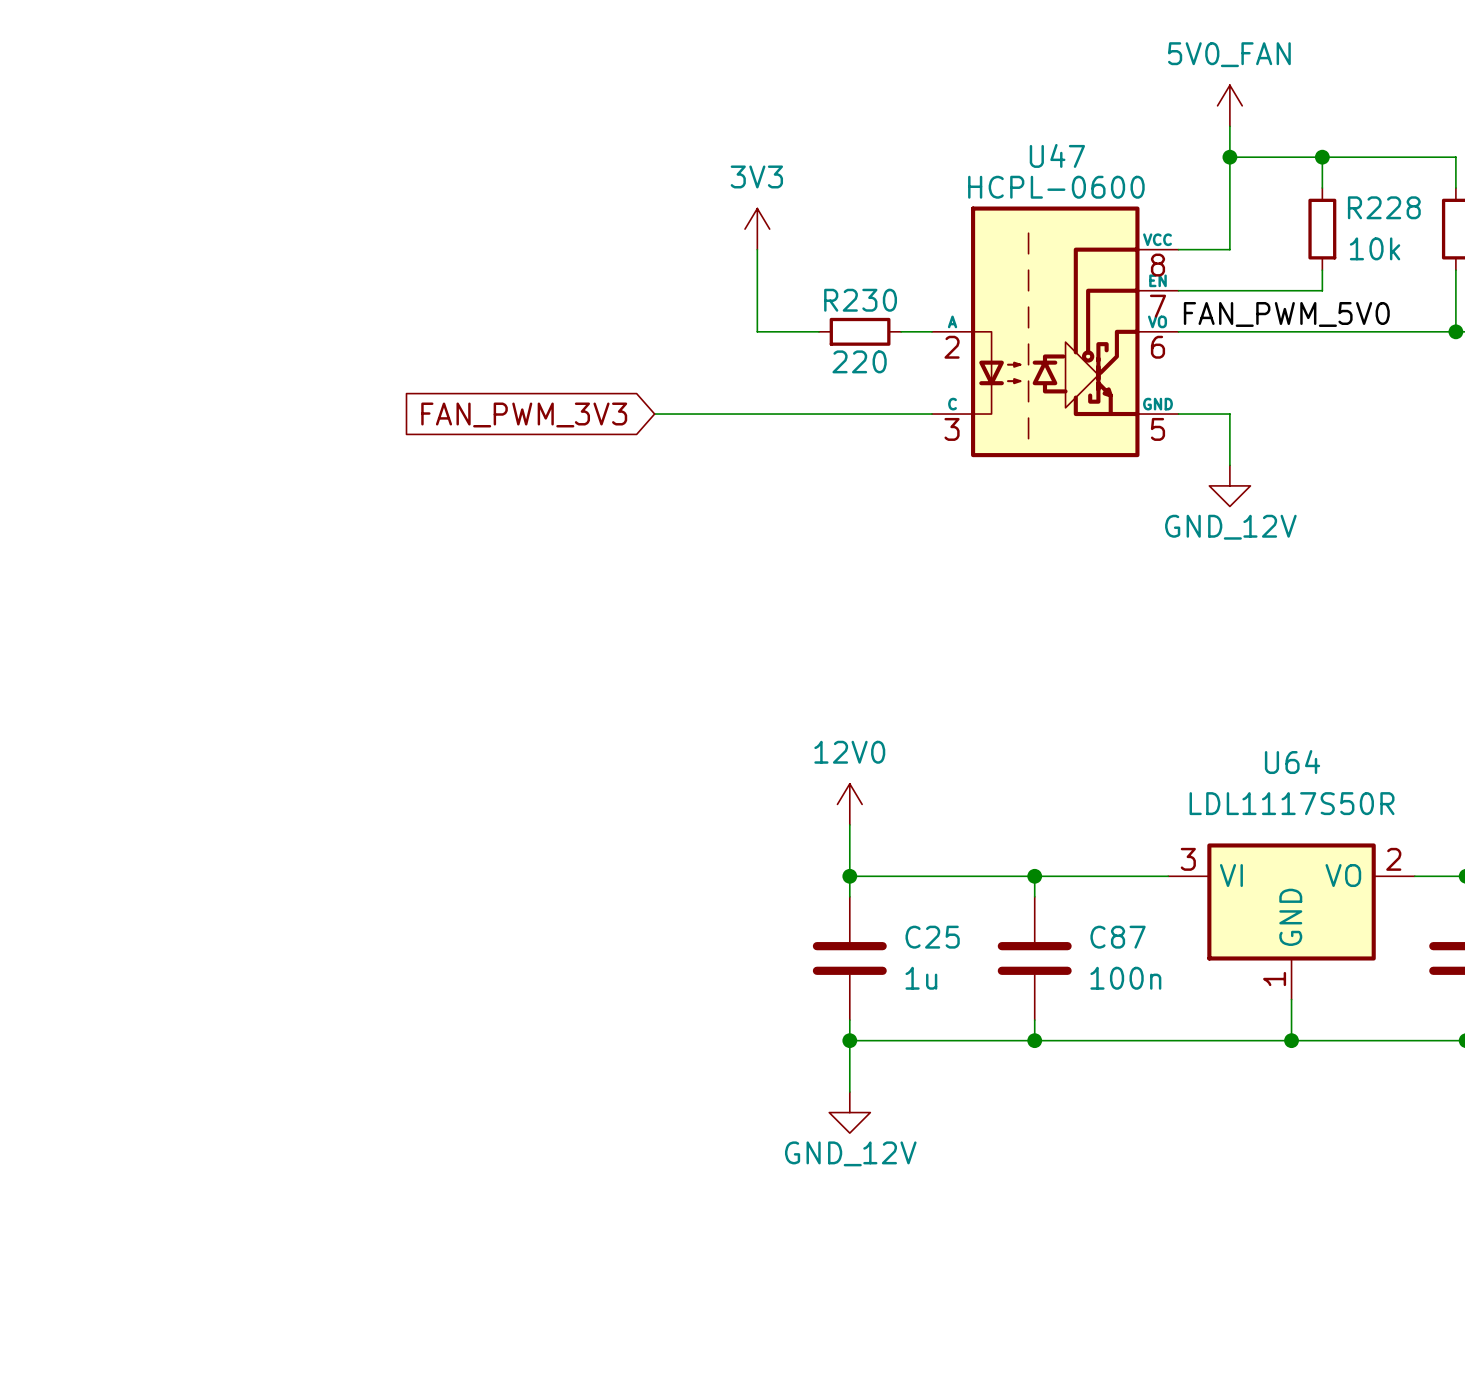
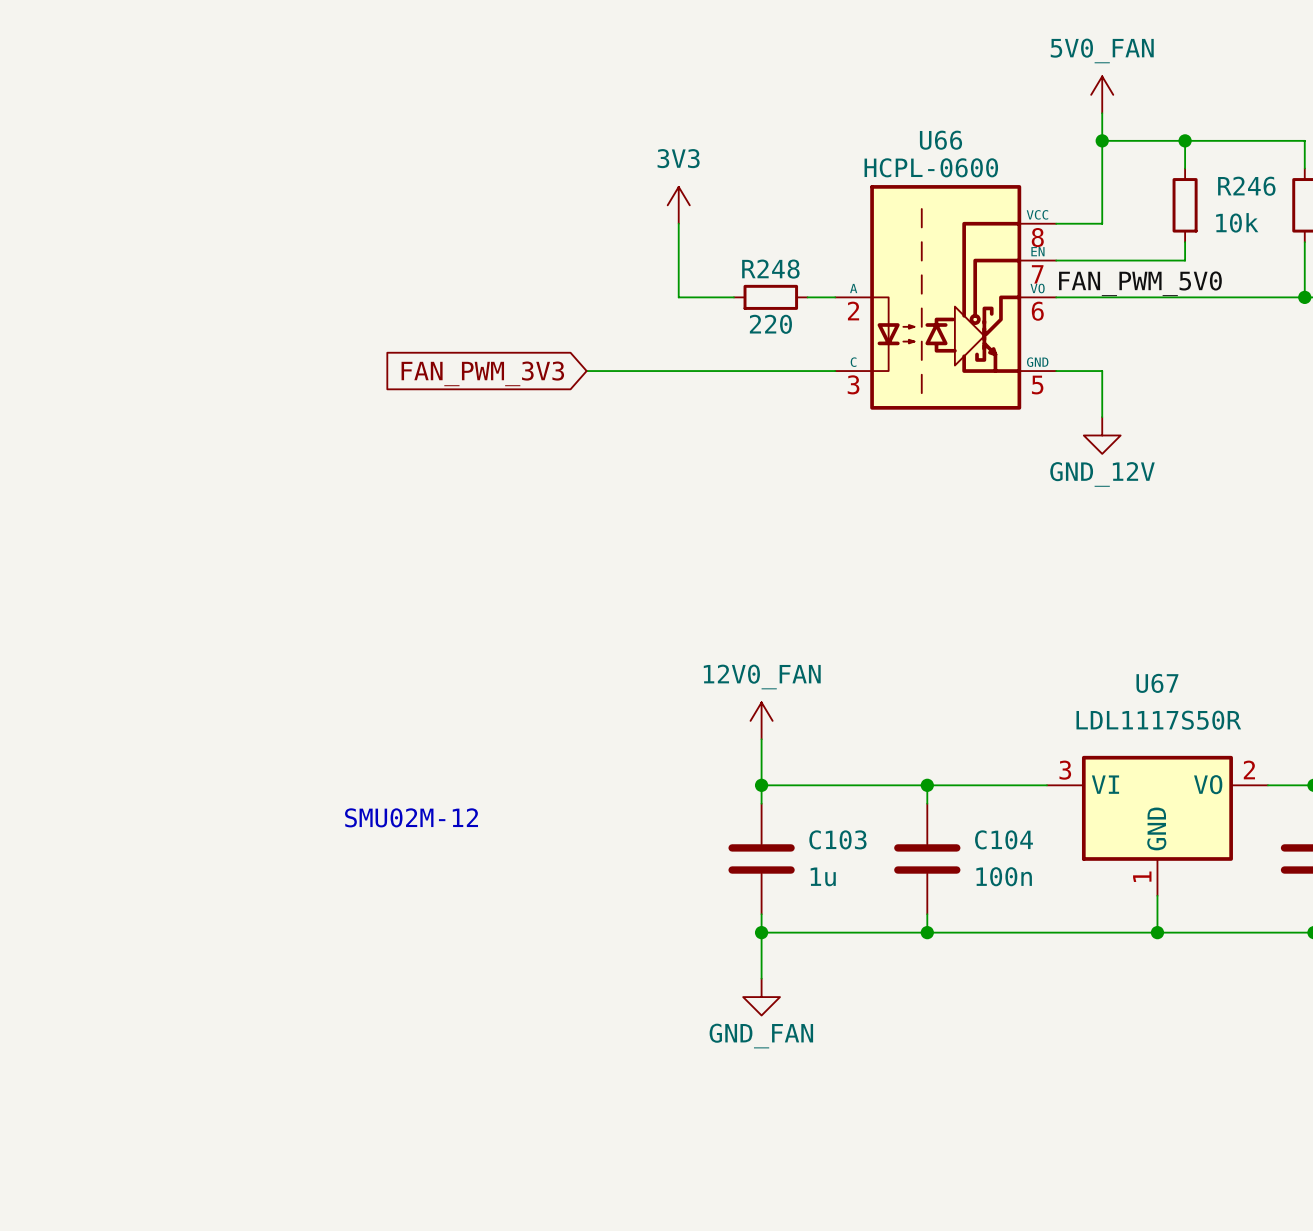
U47 name: U47 (1057, 155) -> U66 (940, 140)
R228 name: R228 (1384, 207) -> R246 (1246, 186)
R230 name: R230 (860, 300) -> R248 (770, 269)
U64 name: U64 (1292, 762) -> U67 (1157, 683)
power symbol: 12V0 (849, 804) -> 12V0_FAN (761, 720)
text: none -> SMU02M-12 (411, 817)
C25 name: C25 (932, 937) -> C103 (837, 839)
C87 name: C87 (1118, 937) -> C104 (1004, 839)
power symbol: GND_12V (849, 1112) -> GND_FAN (761, 997)

